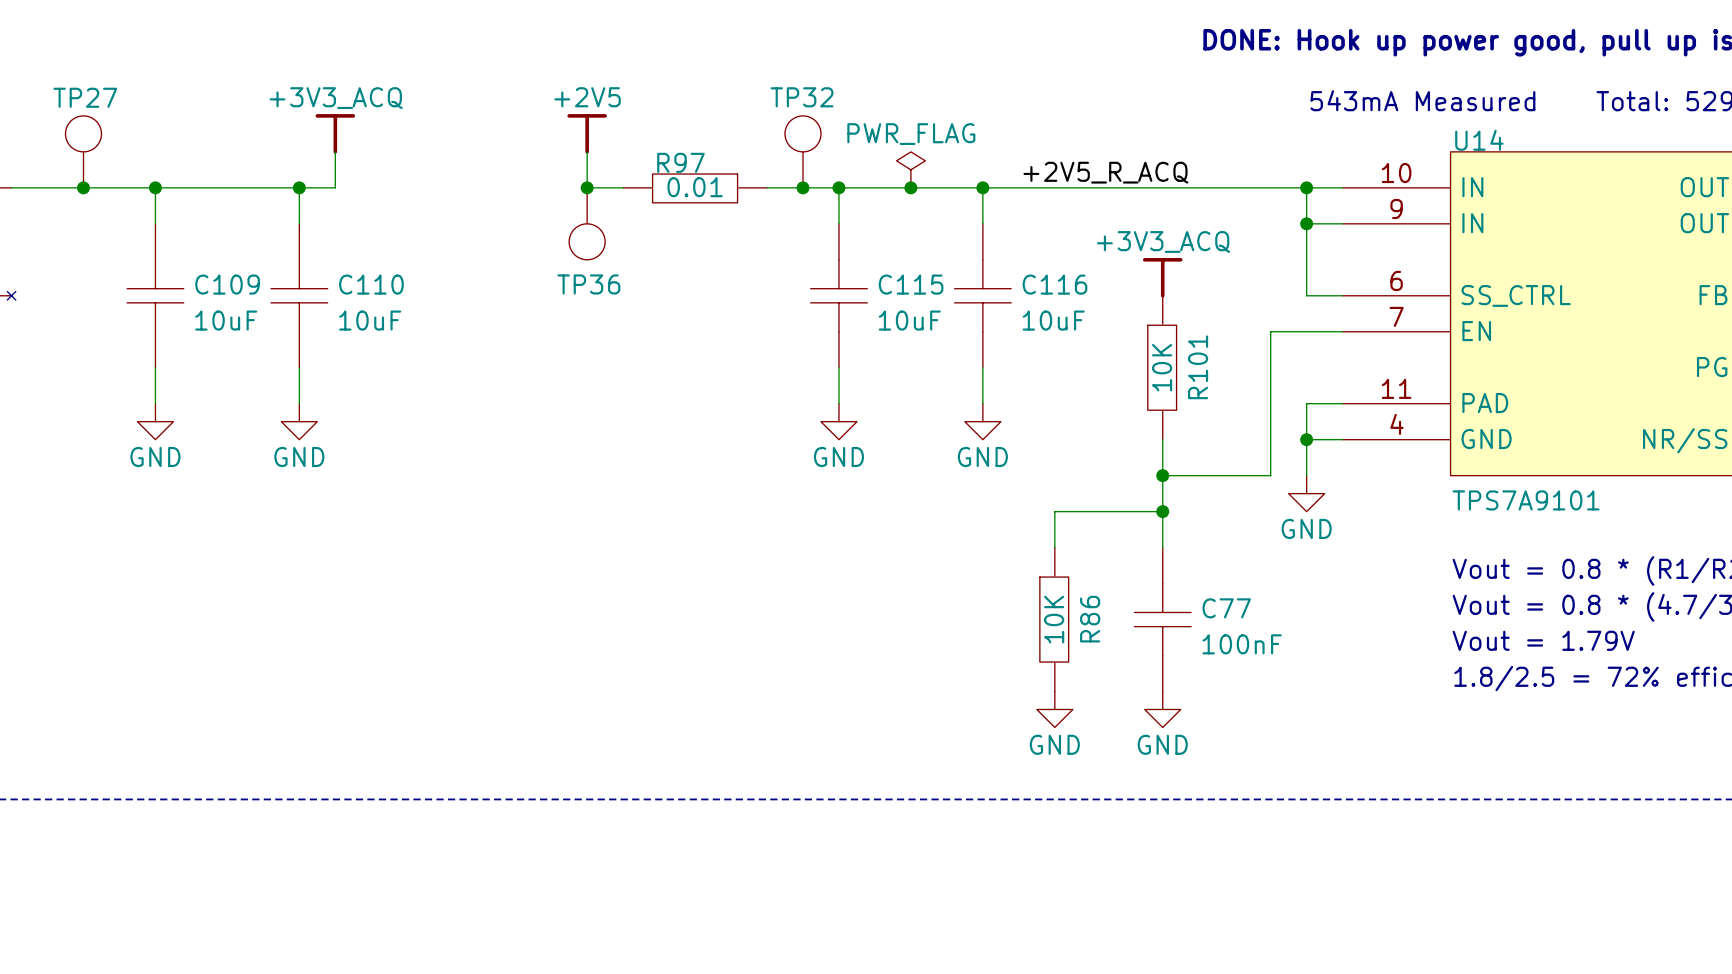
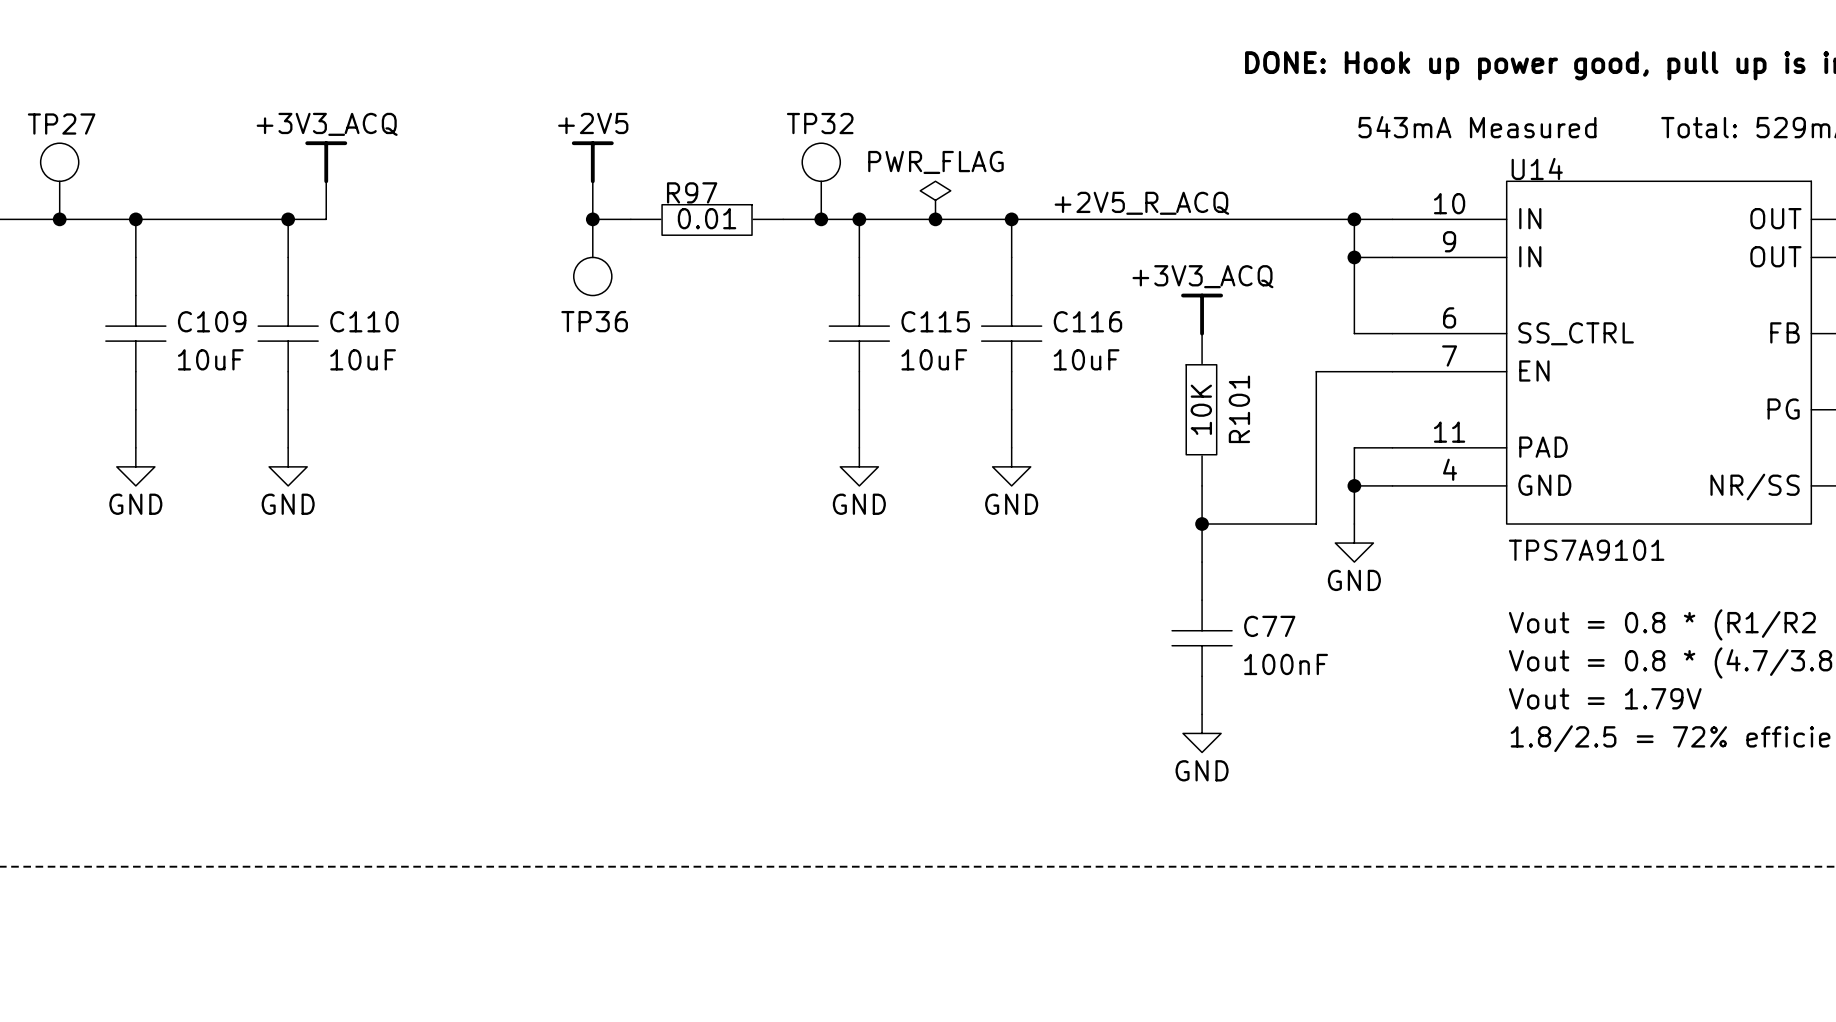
junction: (1162, 511) -> none
wire: (1054, 547) (1054, 511) (1162, 511) (1162, 547) -> none
R86: 10K (1054, 619) -> none
C77 position: (1162, 619) -> (1202, 638)
power symbol: GND (1054, 709) -> none
power symbol position: GND (1162, 709) -> GND (1202, 733)

